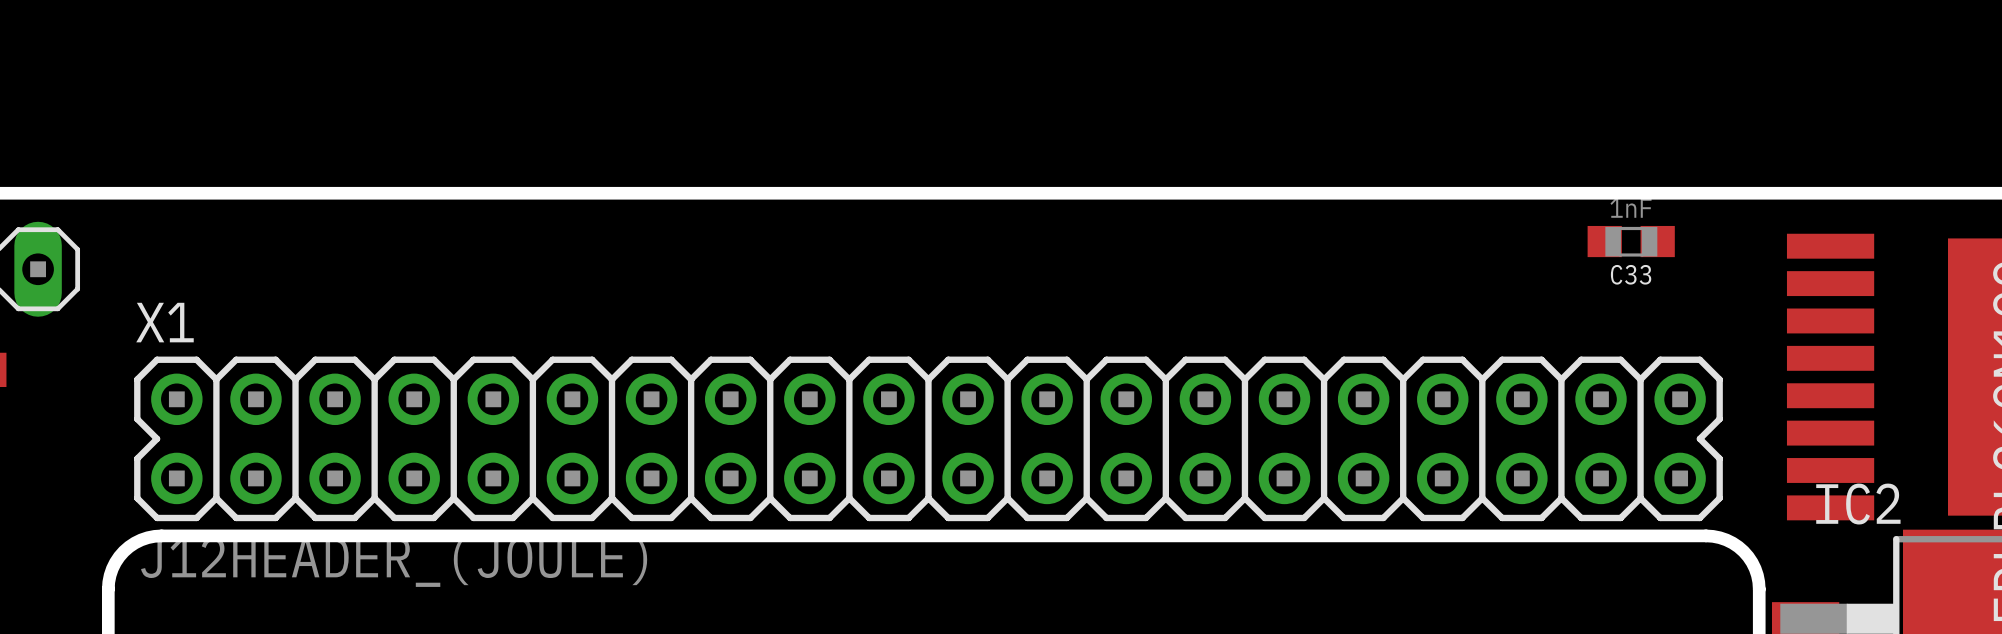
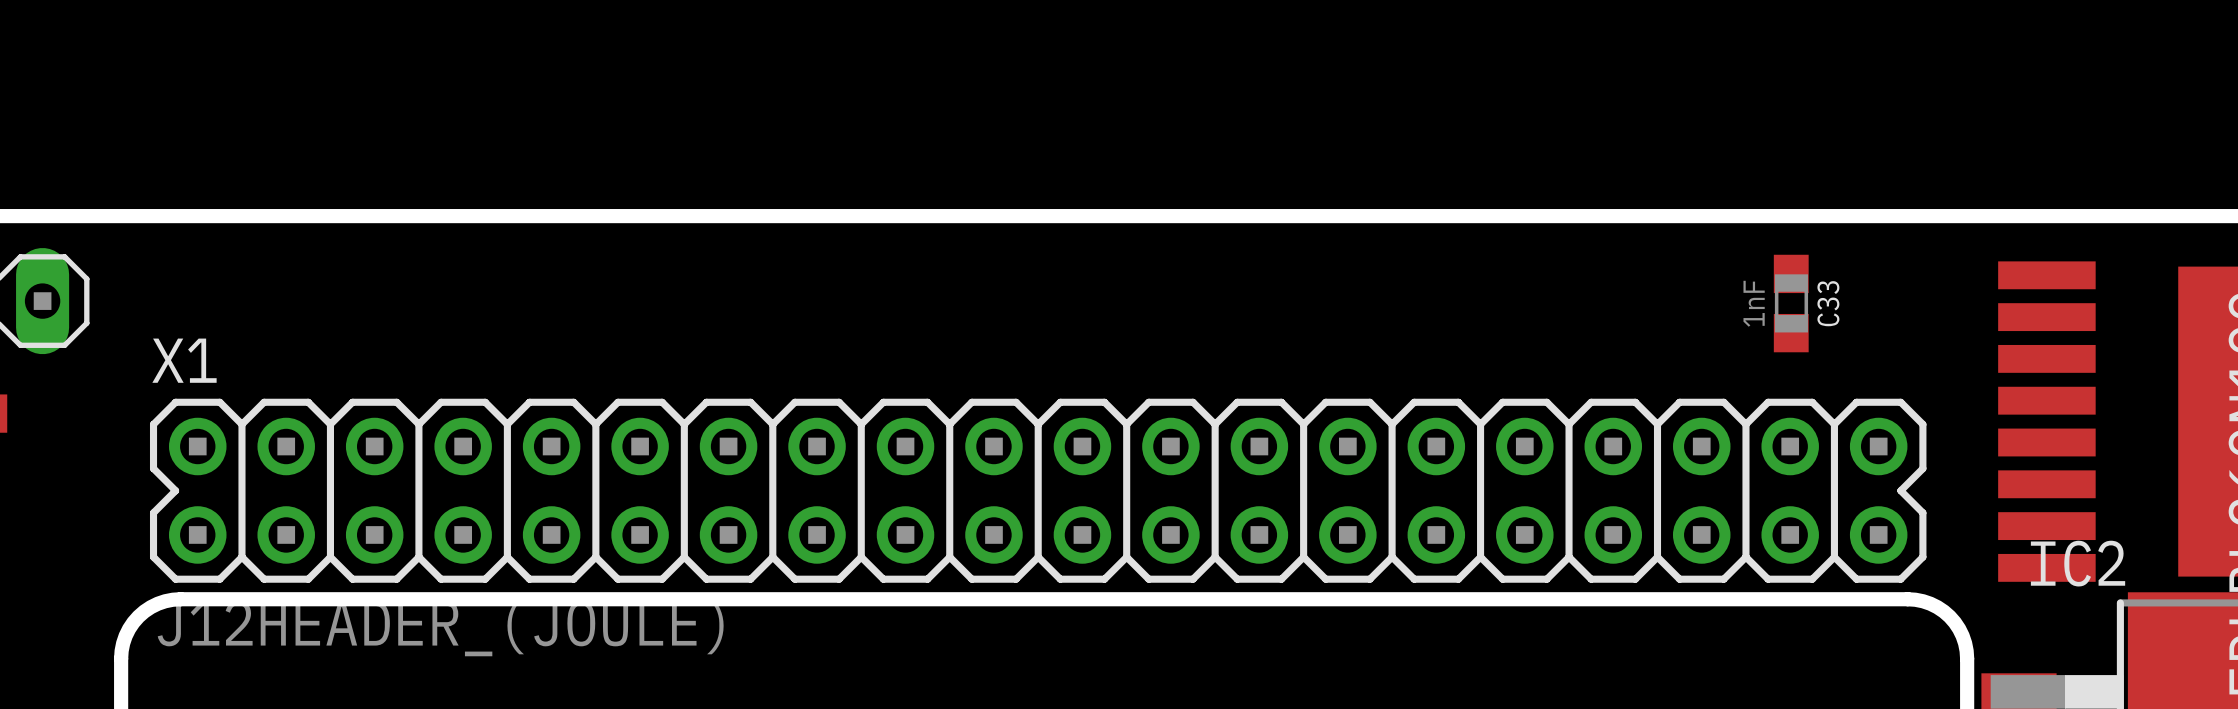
C33 rotation: 0° (1631, 241) -> 90° clockwise (1791, 303)

